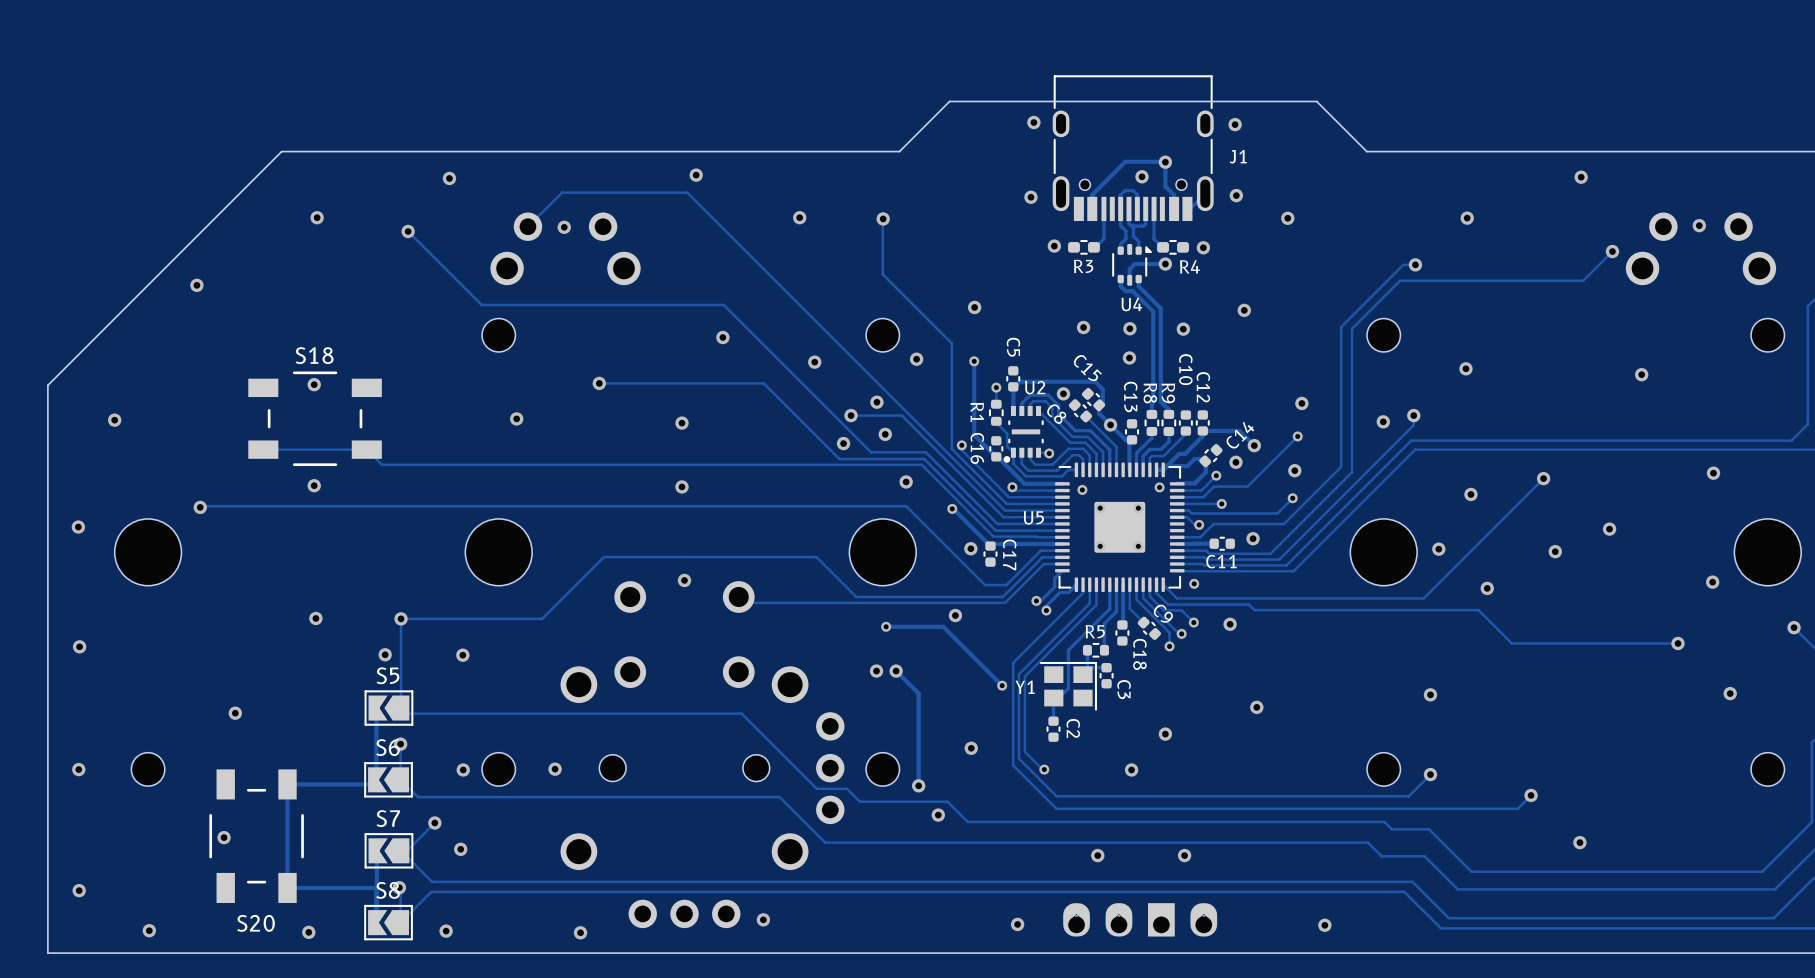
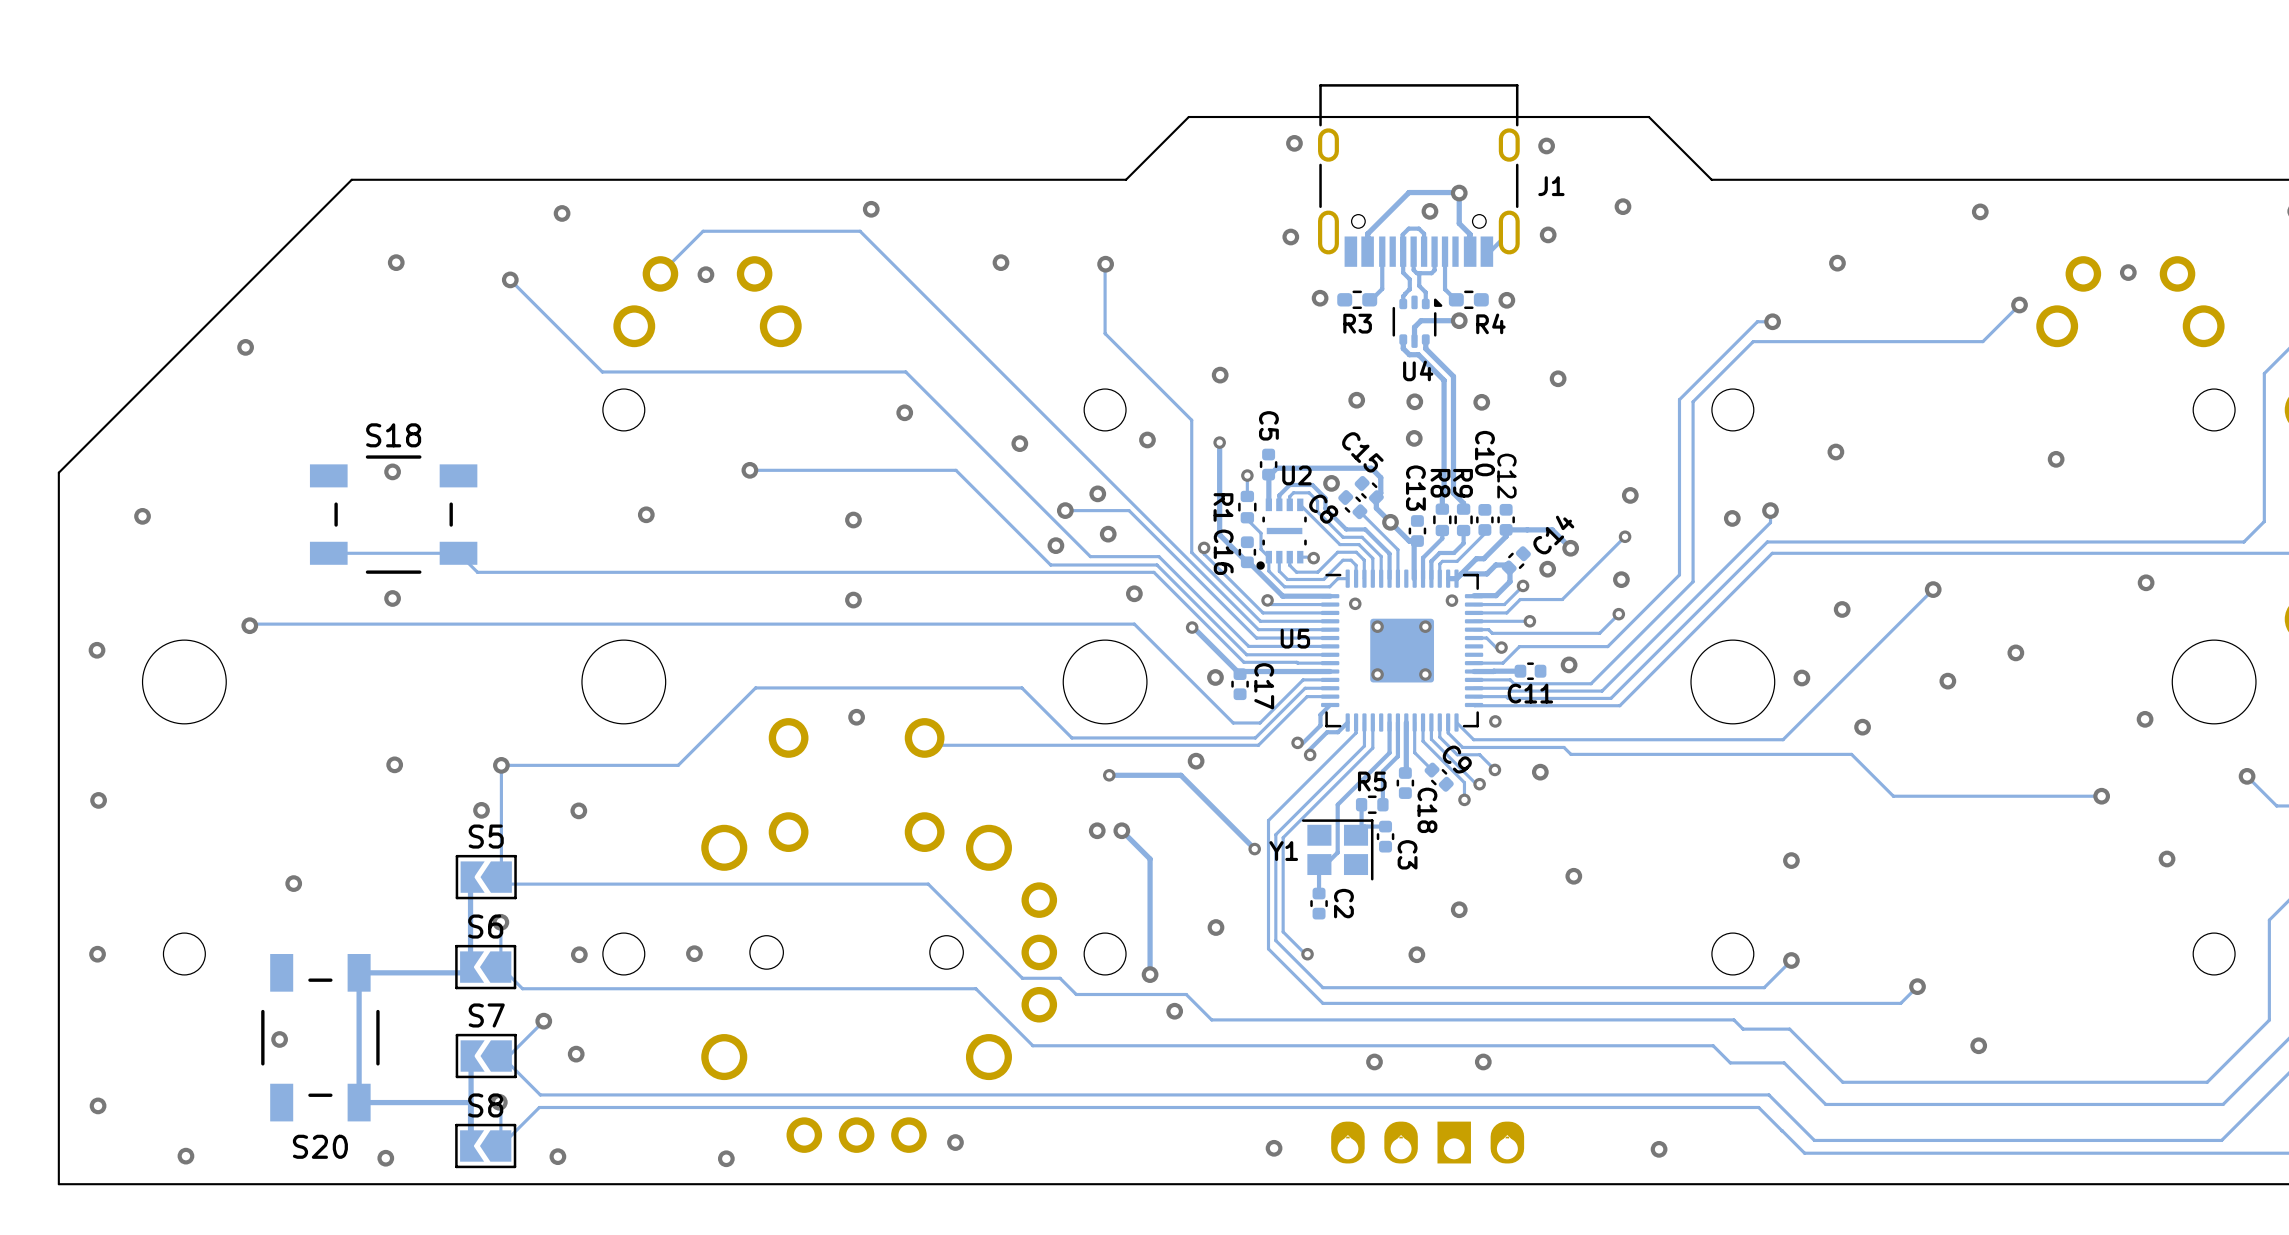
via position: (1287, 218) -> (1622, 206)

